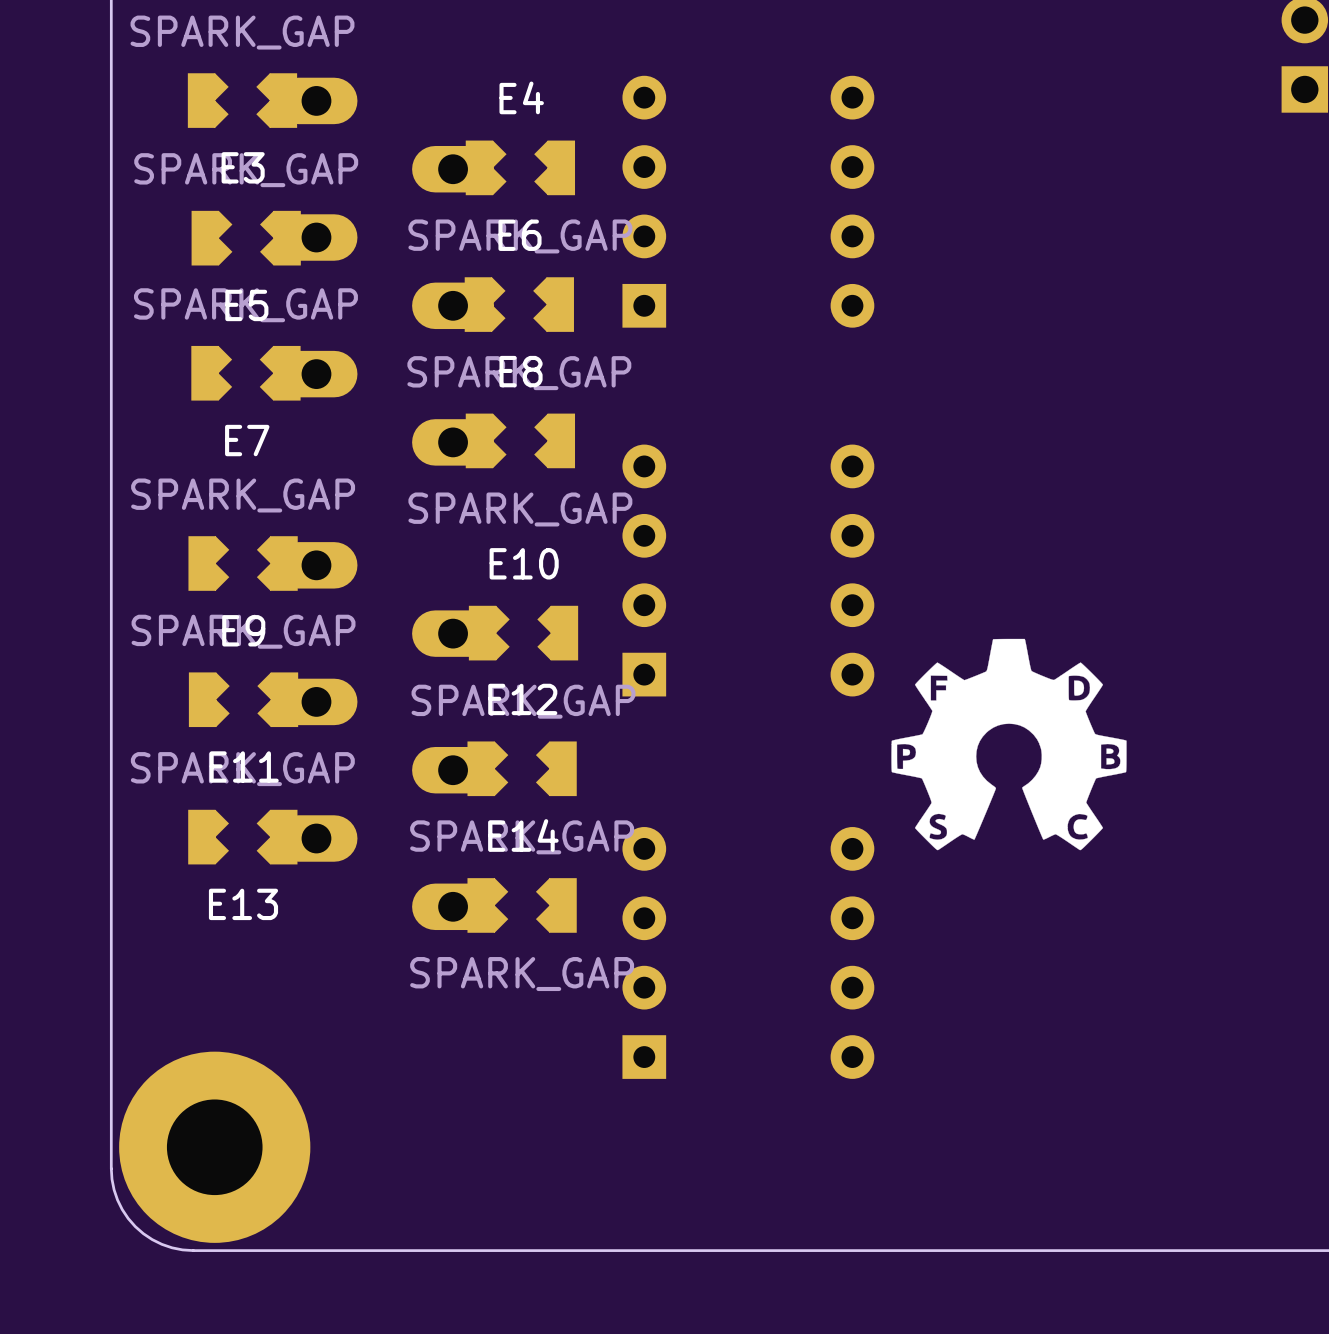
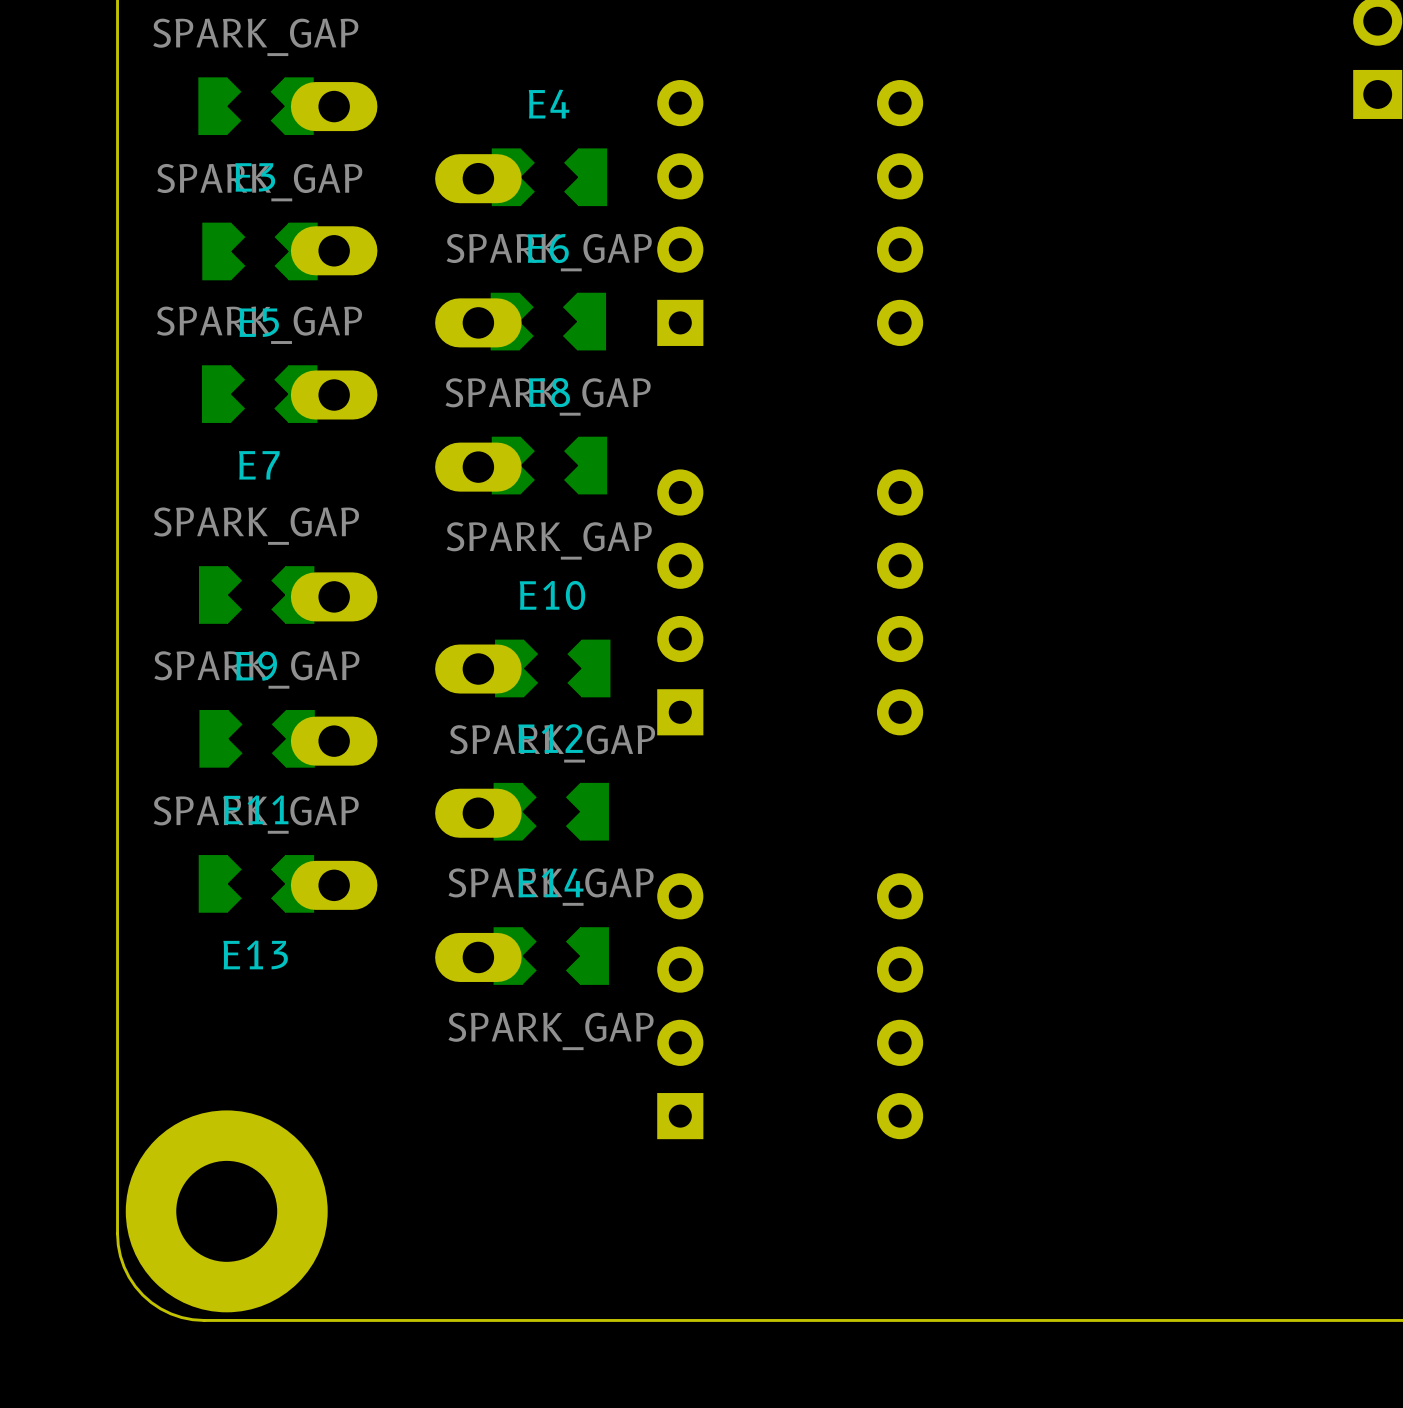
drawing: [891, 638, 1127, 851] -> none

